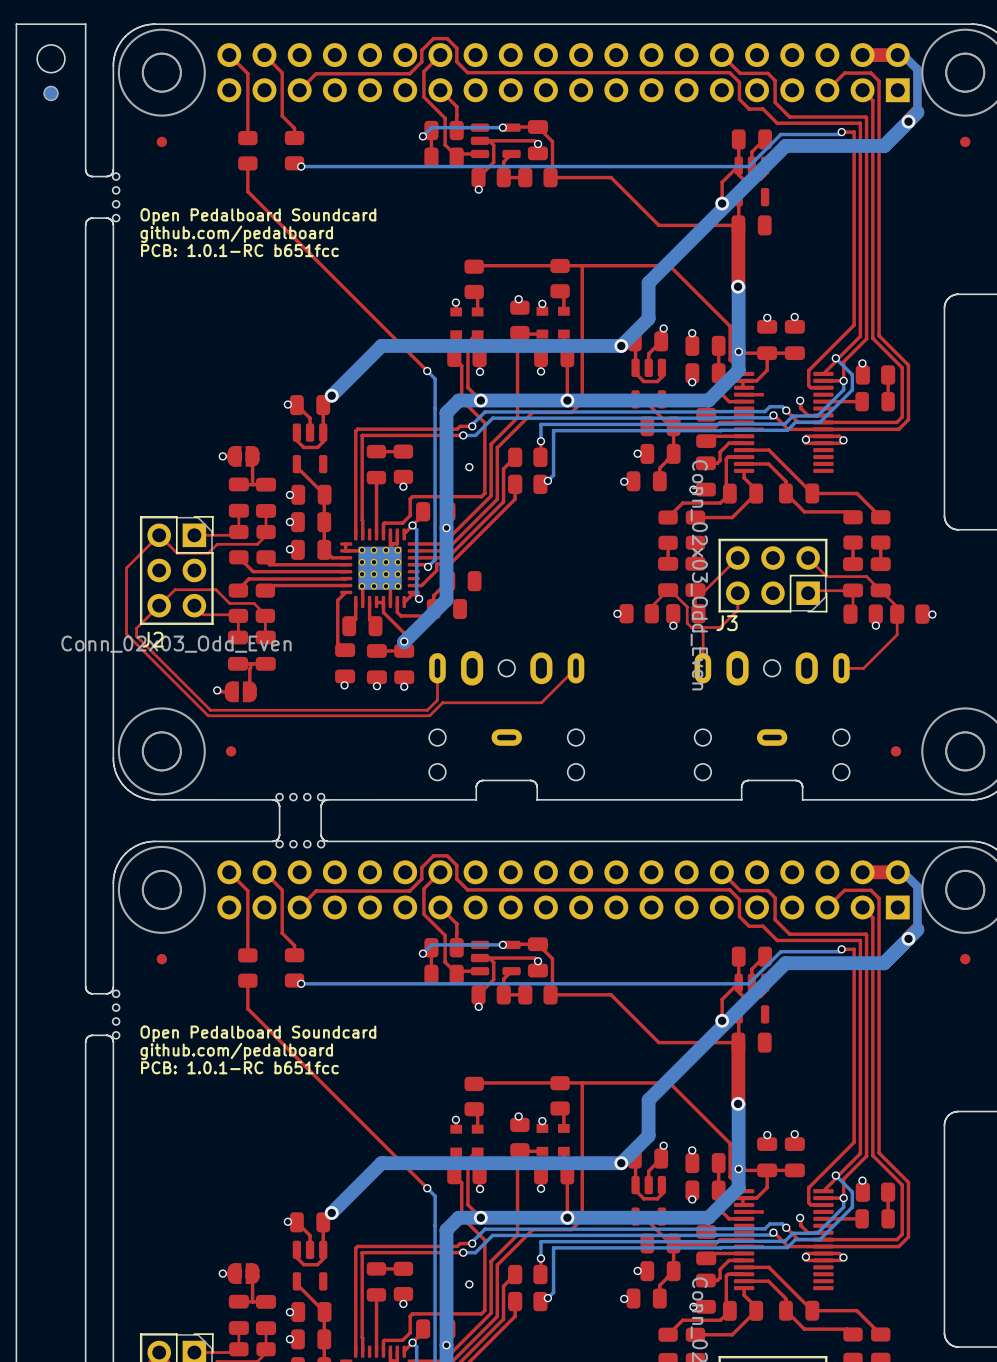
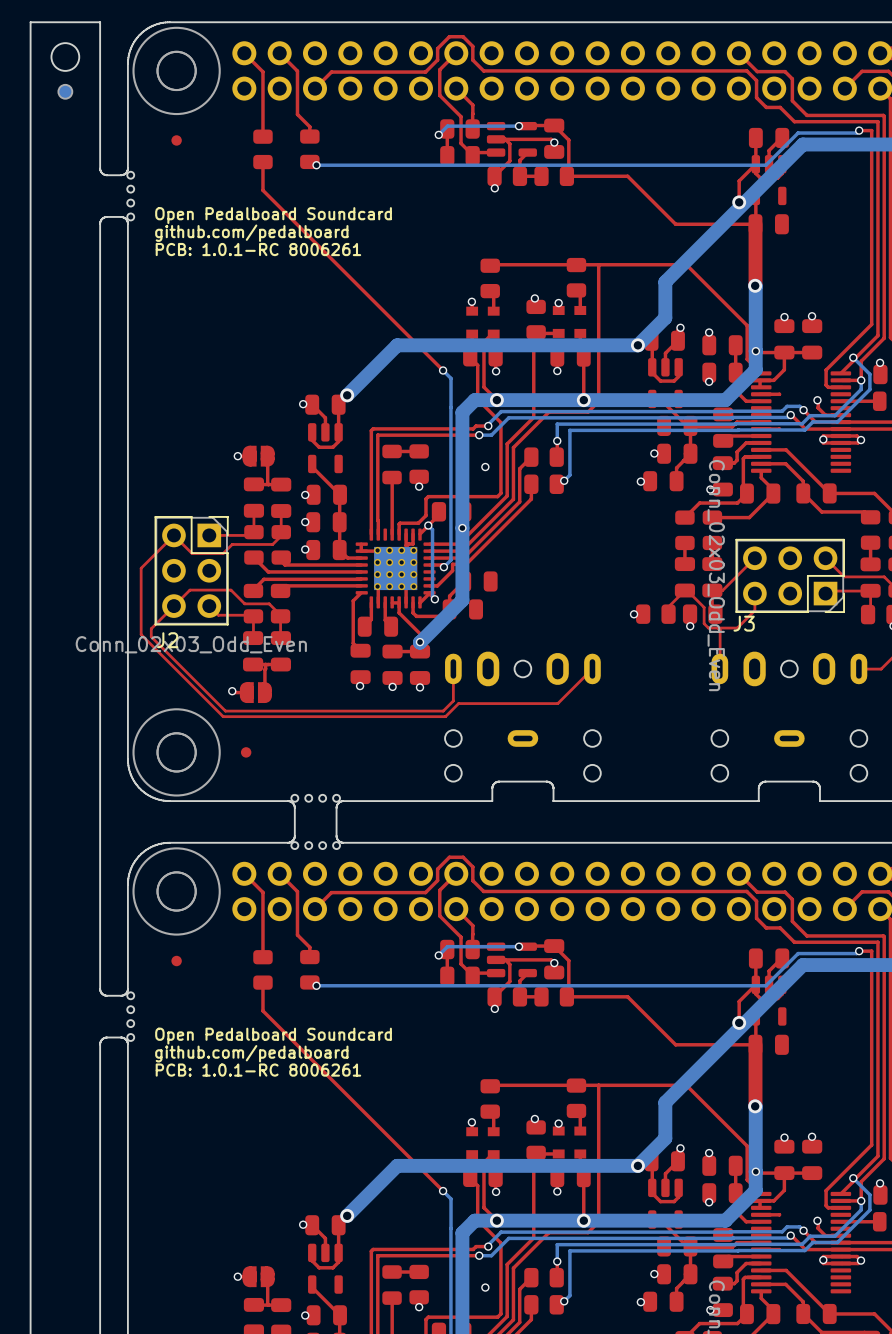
text: PCB: 1.0.1-RC b651fcc (239, 250) -> PCB: 1.0.1-RC 8006261 (258, 249)
text: PCB: 1.0.1-RC b651fcc (239, 1067) -> PCB: 1.0.1-RC 8006261 (258, 1070)

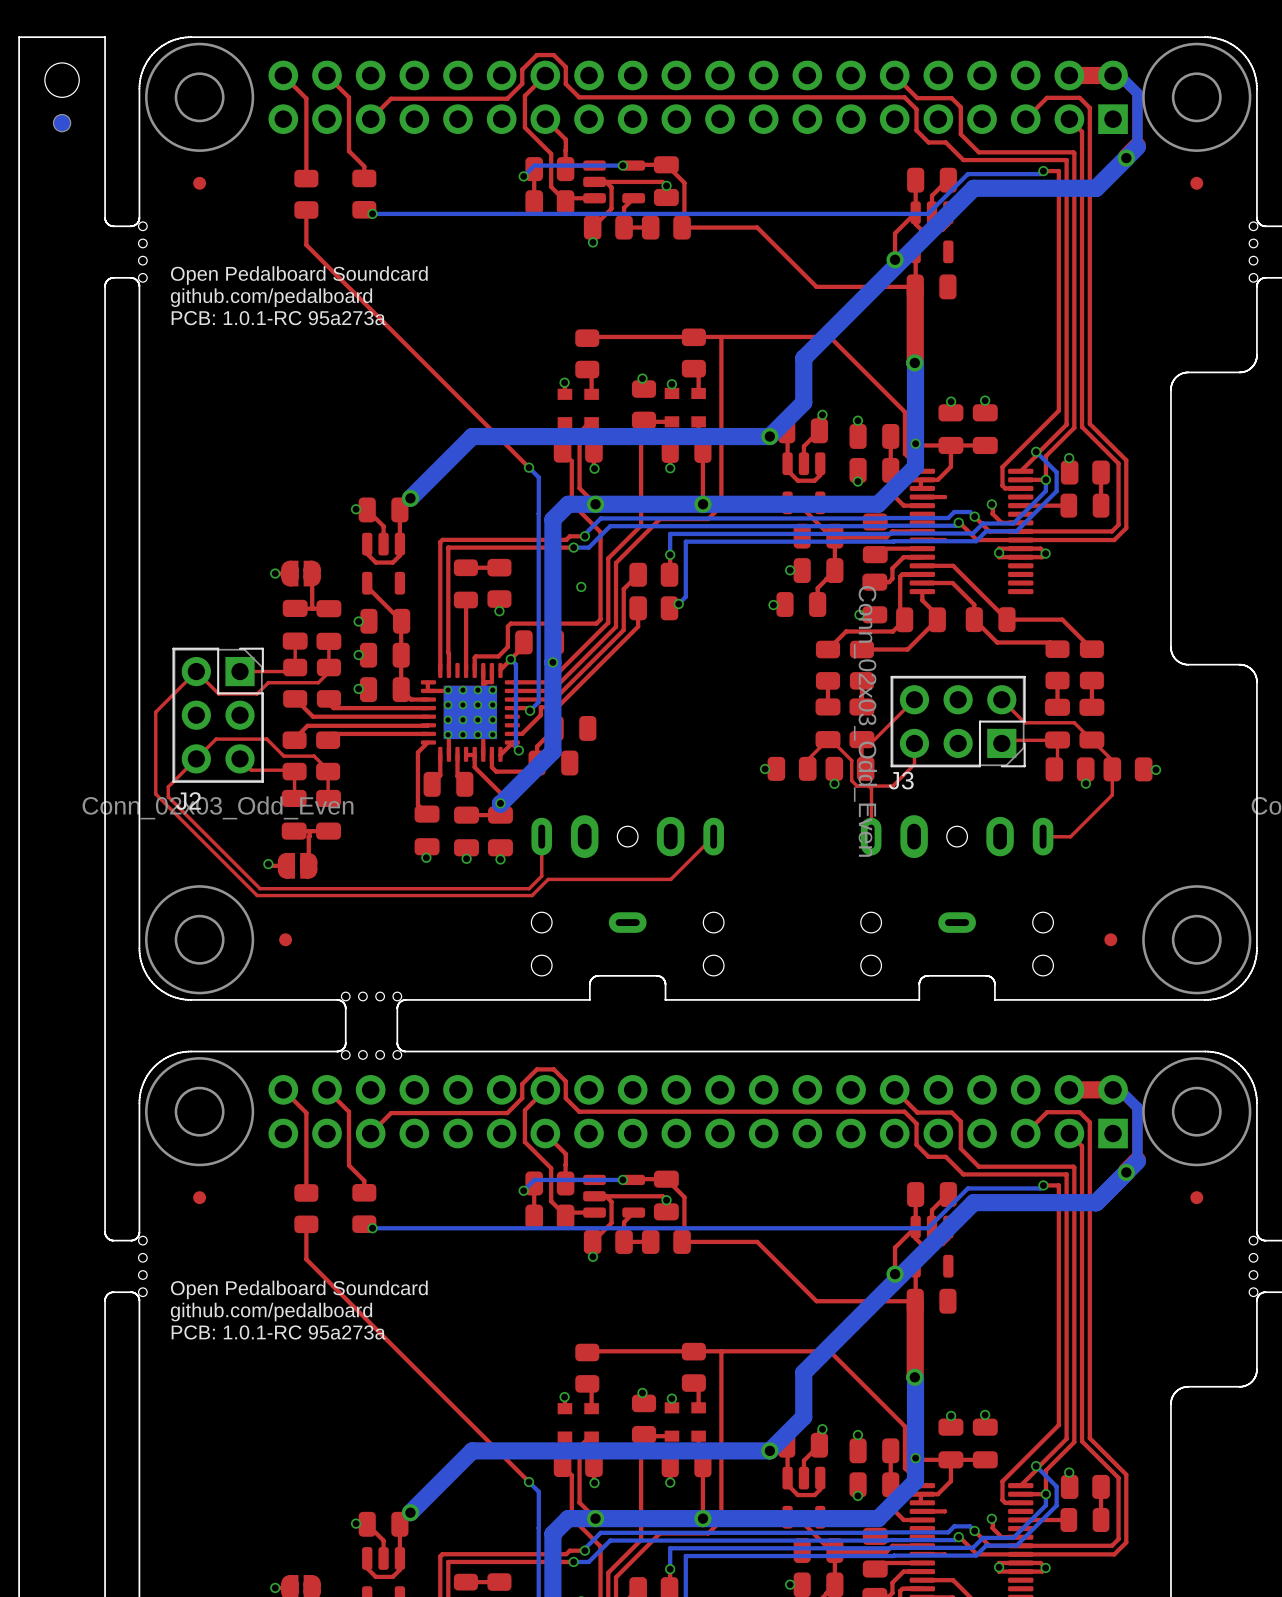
text: PCB: 1.0.1-RC 8006261 (258, 249) -> PCB: 1.0.1-RC 95a273a (278, 318)
text: PCB: 1.0.1-RC 8006261 (258, 1070) -> PCB: 1.0.1-RC 95a273a (278, 1332)

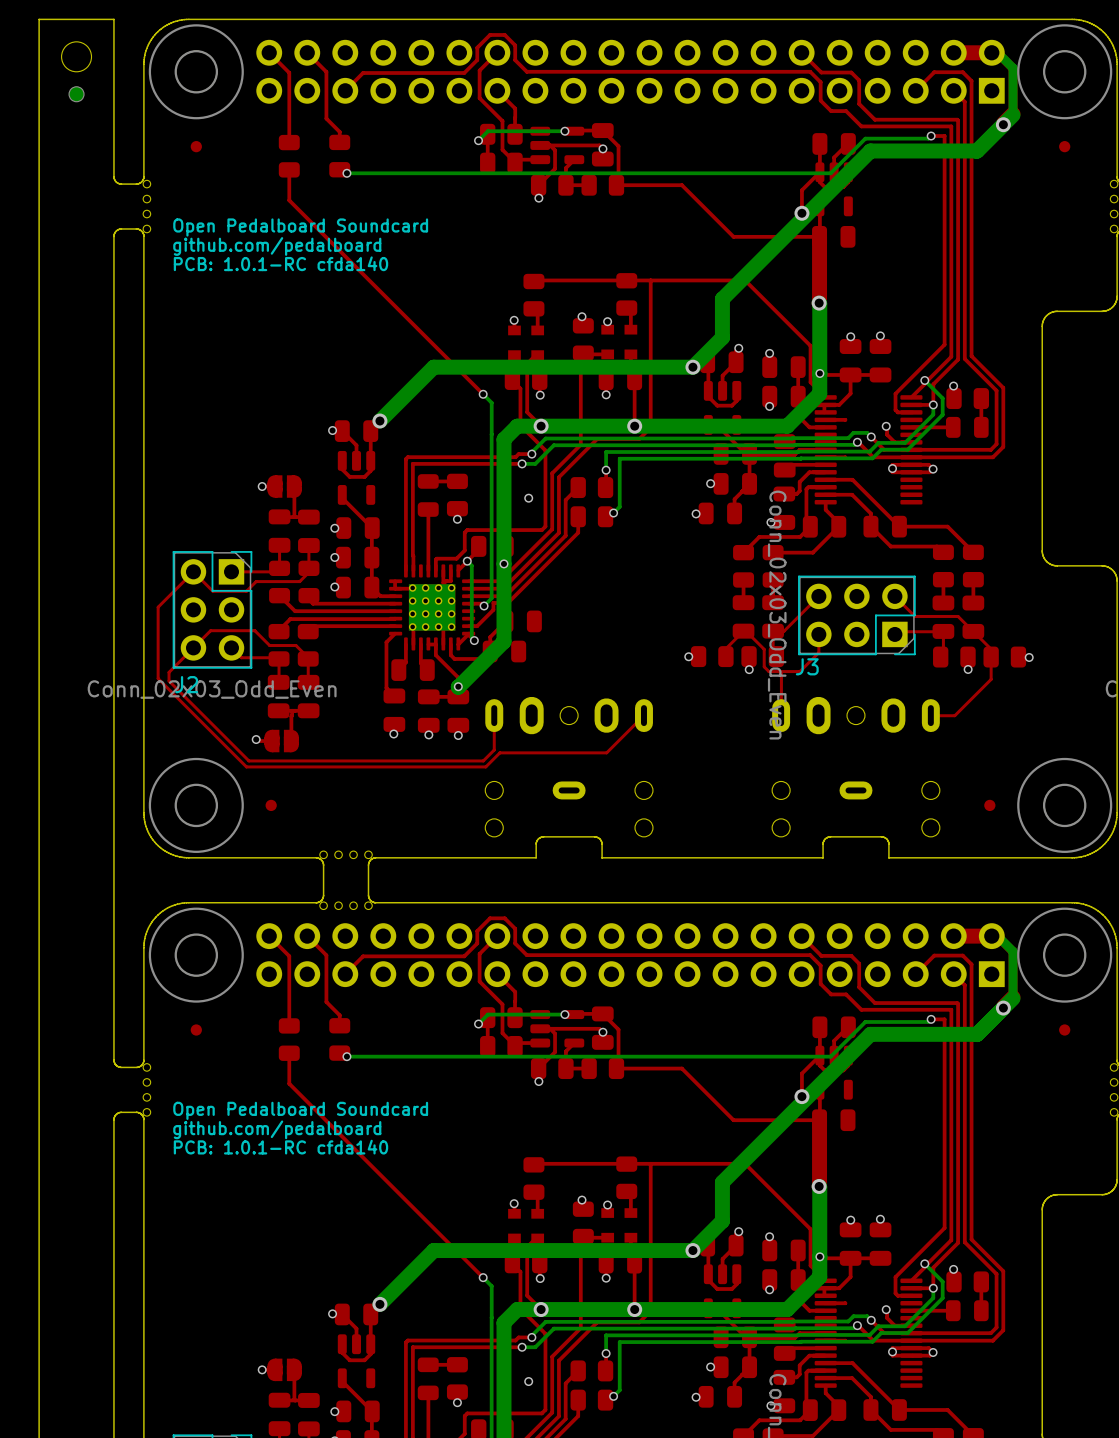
text: PCB: 1.0.1-RC 95a273a (278, 318) -> PCB: 1.0.1-RC cfda140 (280, 263)
text: PCB: 1.0.1-RC 95a273a (278, 1332) -> PCB: 1.0.1-RC cfda140 (280, 1147)

